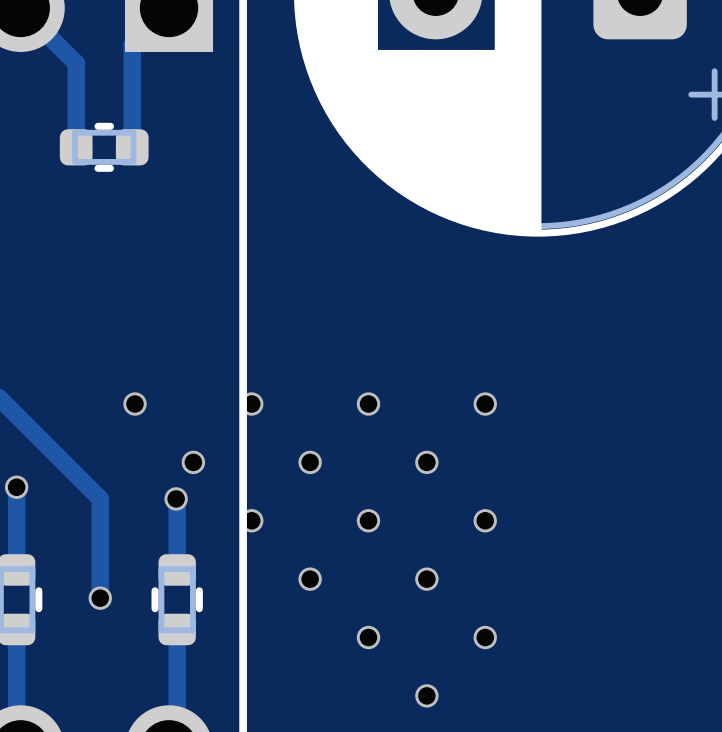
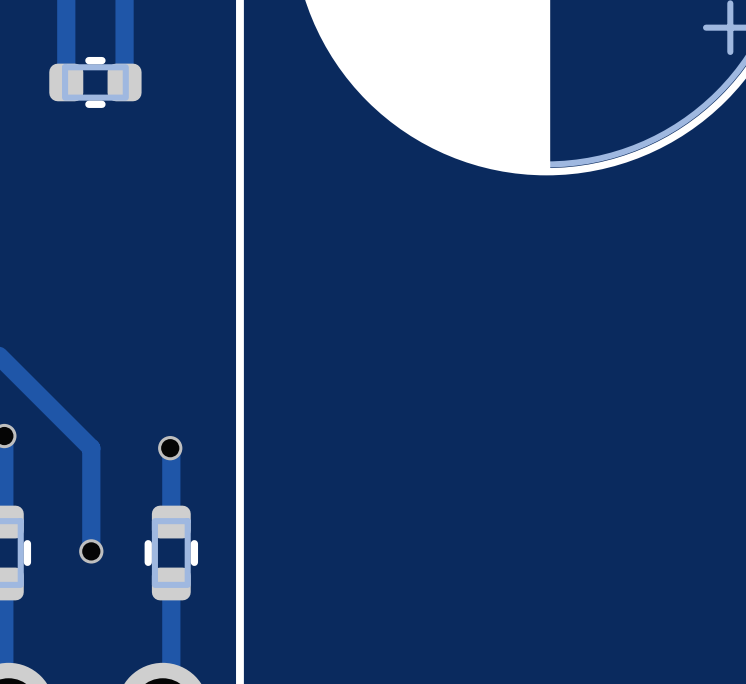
via: (135, 404) -> none
via: (251, 404) -> none
via: (368, 404) -> none
via: (485, 404) -> none
via: (193, 462) -> none
via: (310, 462) -> none
via: (426, 462) -> none
via: (251, 520) -> none
via: (368, 520) -> none
via: (485, 520) -> none
via: (310, 579) -> none
via: (426, 579) -> none
via: (368, 637) -> none
via: (485, 637) -> none
via: (426, 695) -> none

